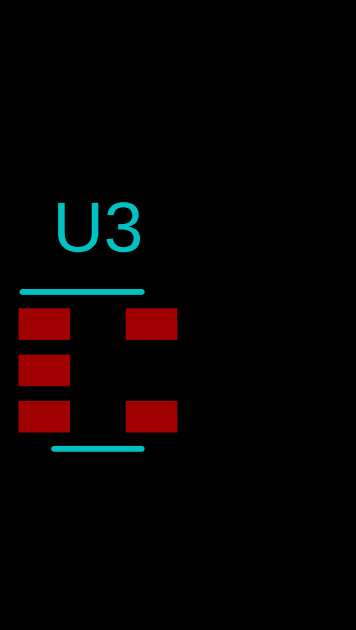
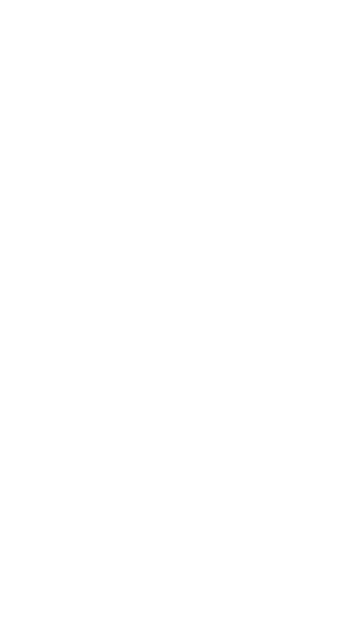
U3: (97, 370) -> none

